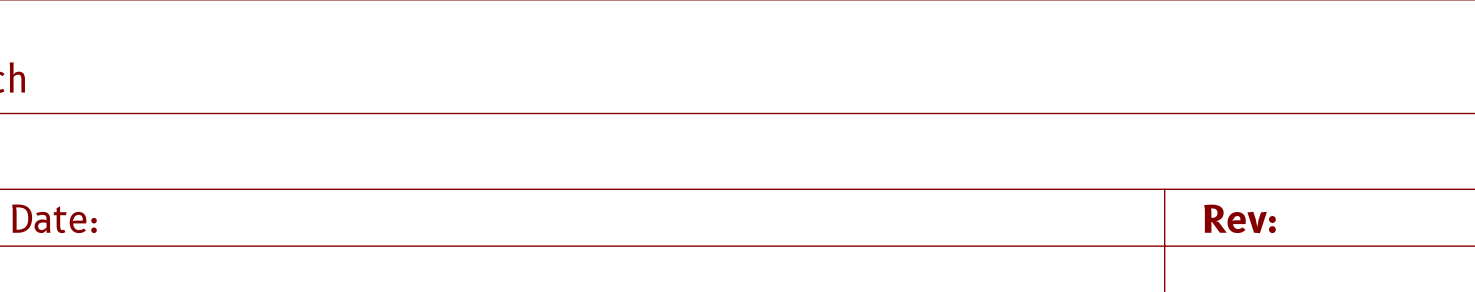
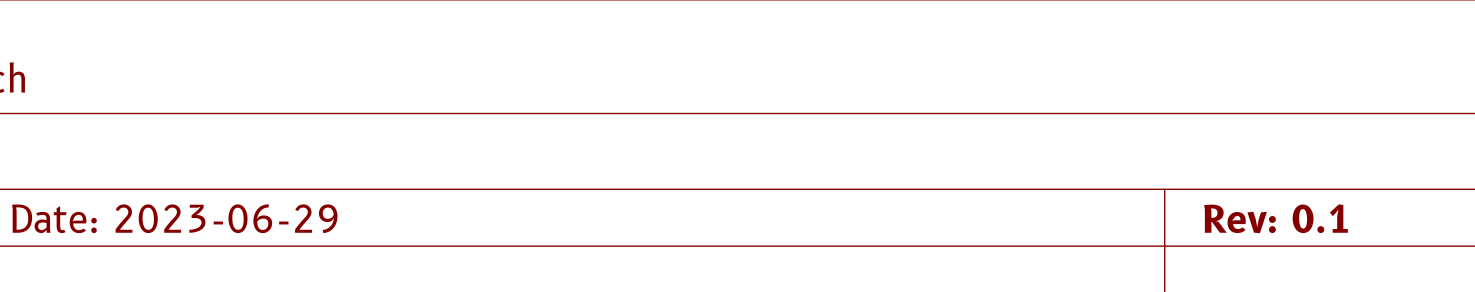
title block: Date: (54, 218) -> Date: 2023-06-29 (174, 218)
title block: Rev: (1240, 218) -> Rev: 0.1 (1276, 218)

